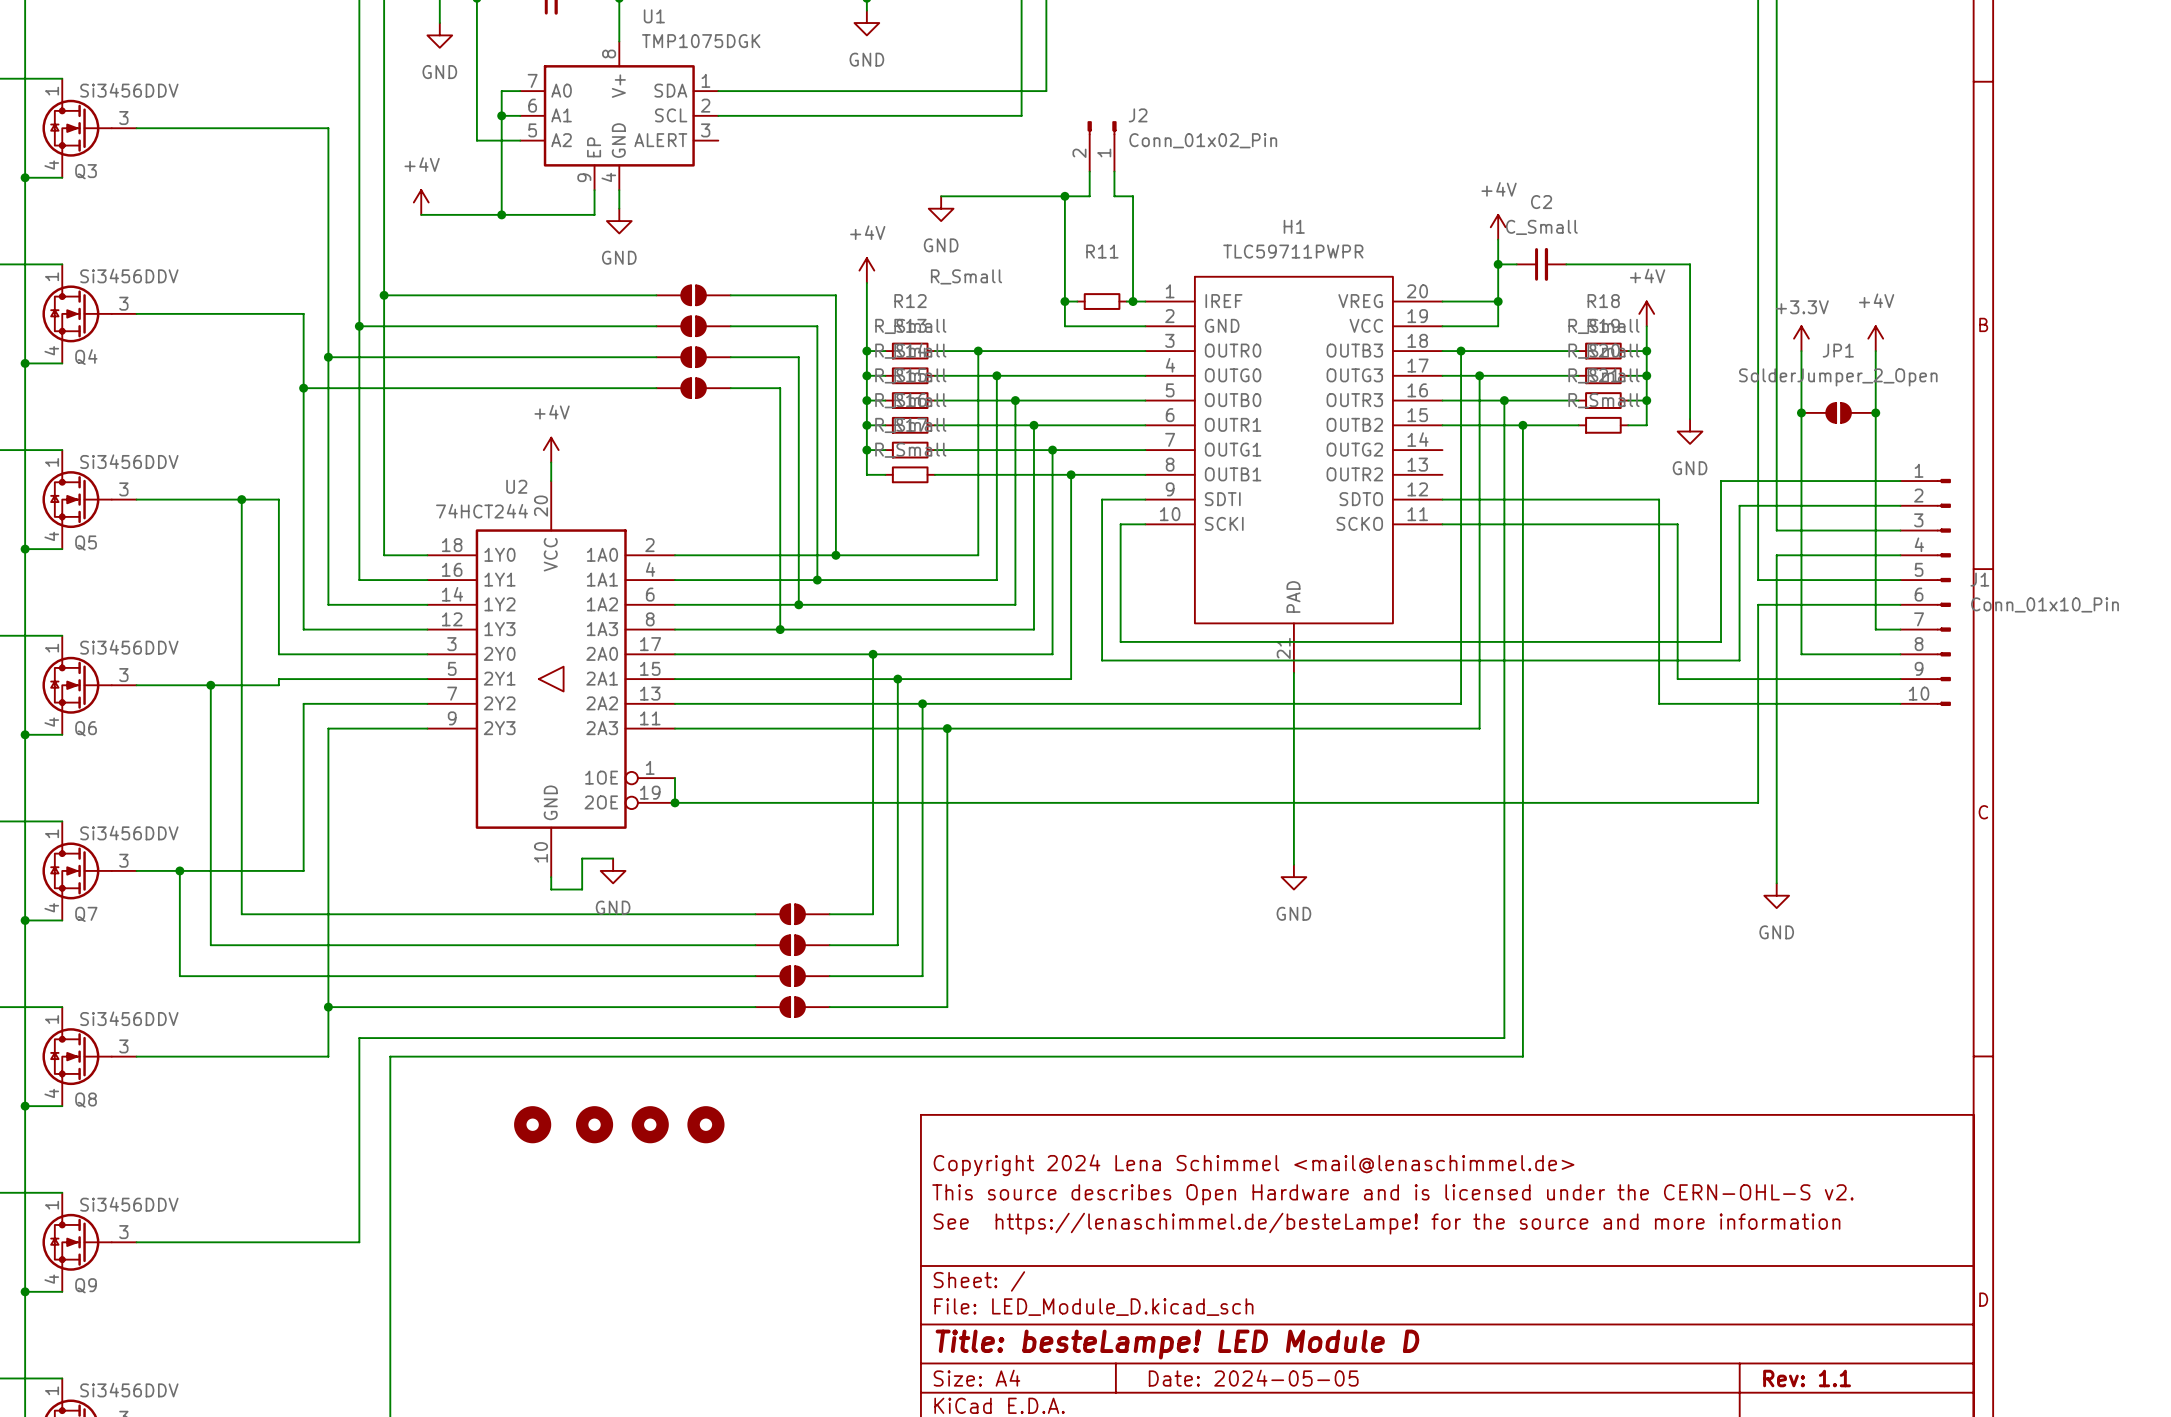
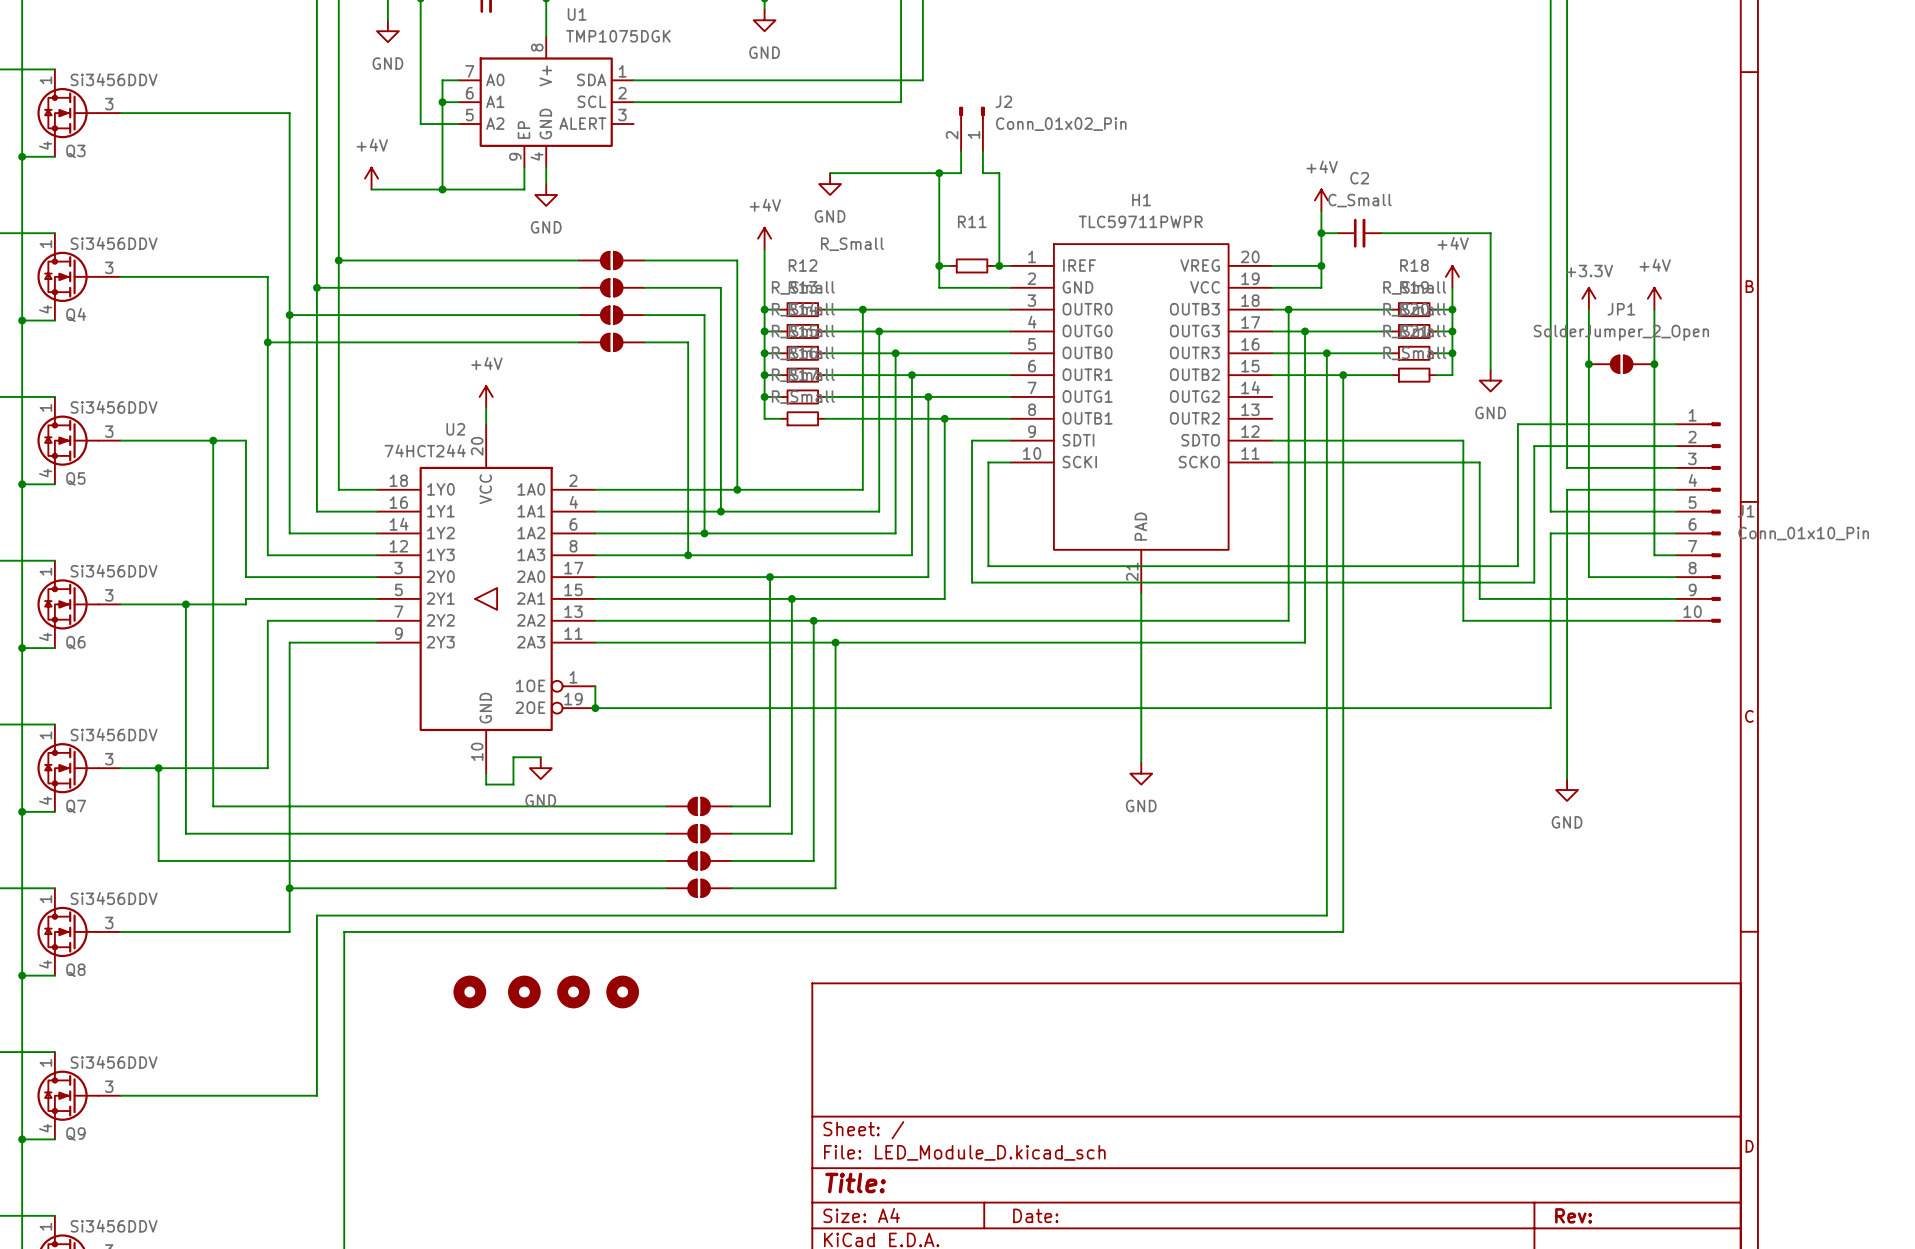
title block: Copyright 2024 Lena Schimmel <mail@lenaschimmel.de> (1254, 1165) -> none
title block: This source describes Open Hardware and is licensed under the CERN-OHL-S v2. (1392, 1194) -> none
title block: See https://lenaschimmel.de/besteLampe! for the source and more information (1387, 1223) -> none
title block: Title: besteLampe! LED Module D (1177, 1344) -> Title: (855, 1183)
title block: Date: 2024-05-05 (1253, 1378) -> Date: (1035, 1215)
title block: Rev: 1.1 (1807, 1378) -> Rev: (1573, 1215)

